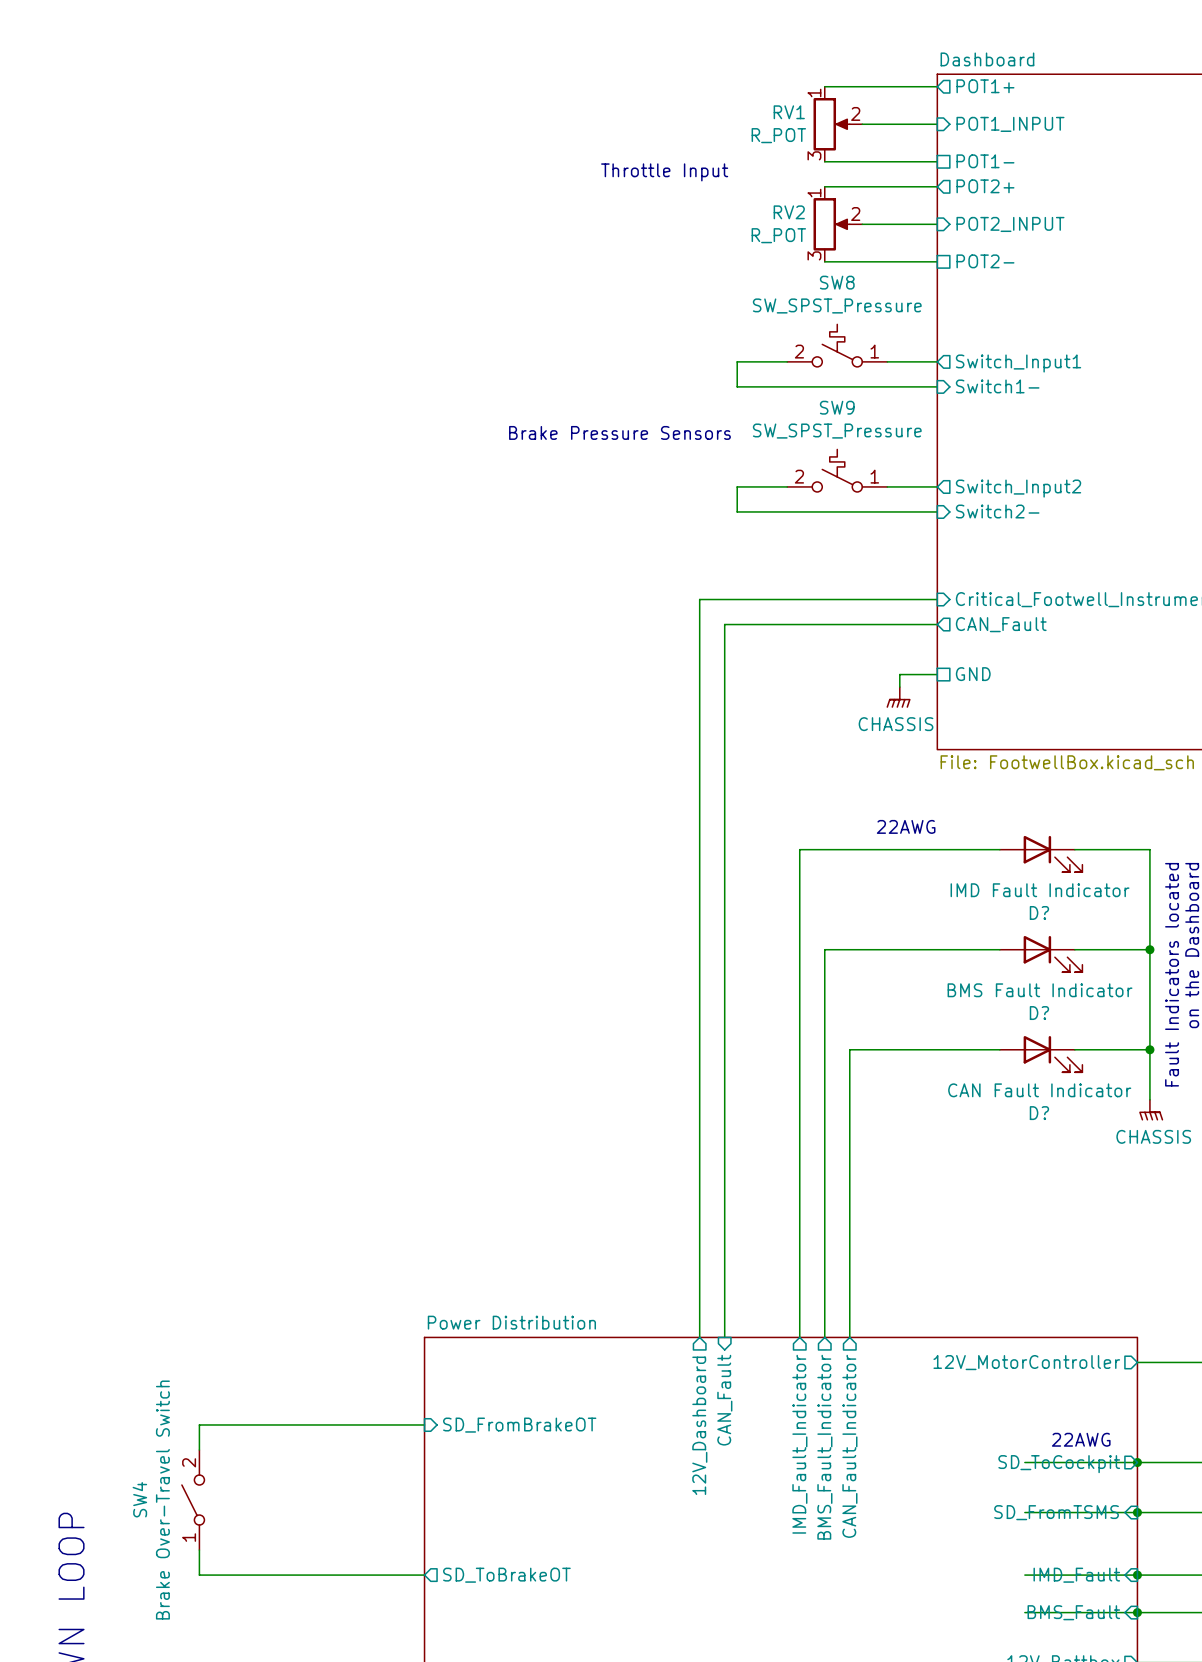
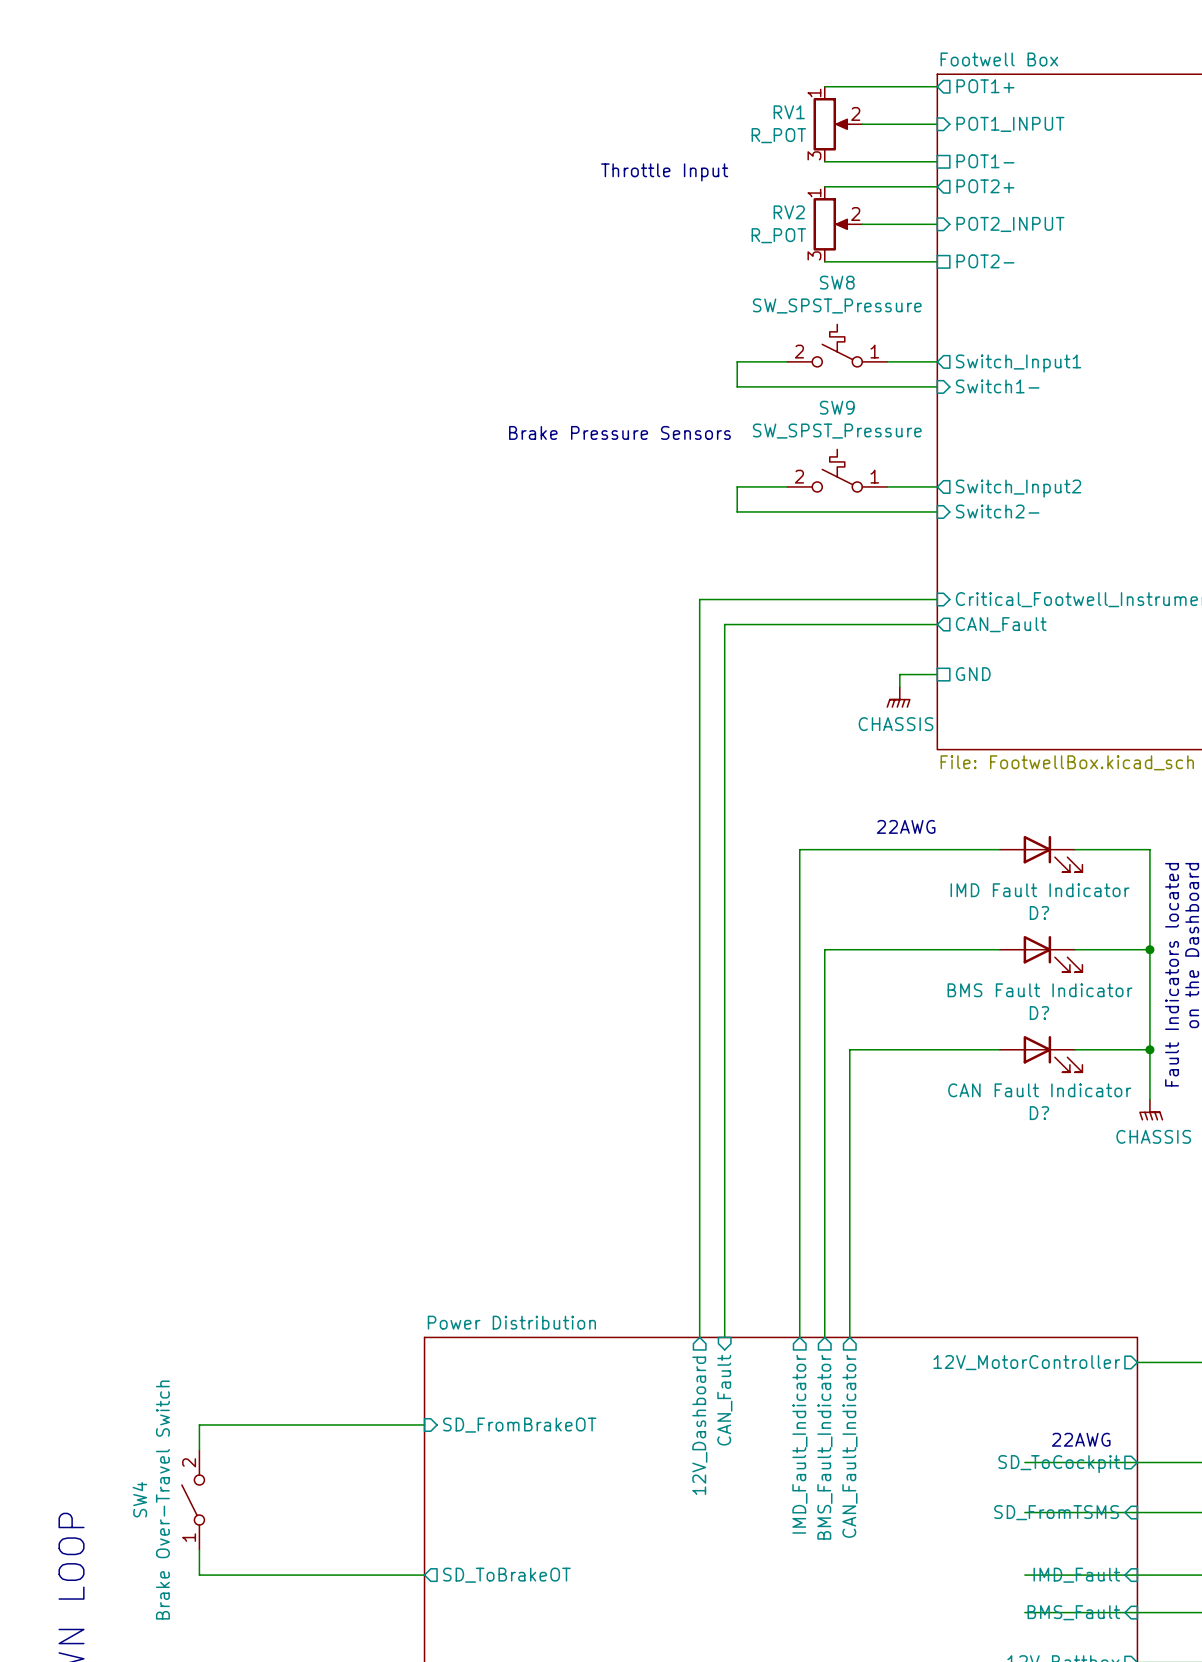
sheet Dashboard name: Dashboard (987, 59) -> Footwell Box (999, 59)
junction: (1137, 1462) -> none
junction: (1137, 1512) -> none
junction: (1137, 1575) -> none
junction: (1137, 1612) -> none

